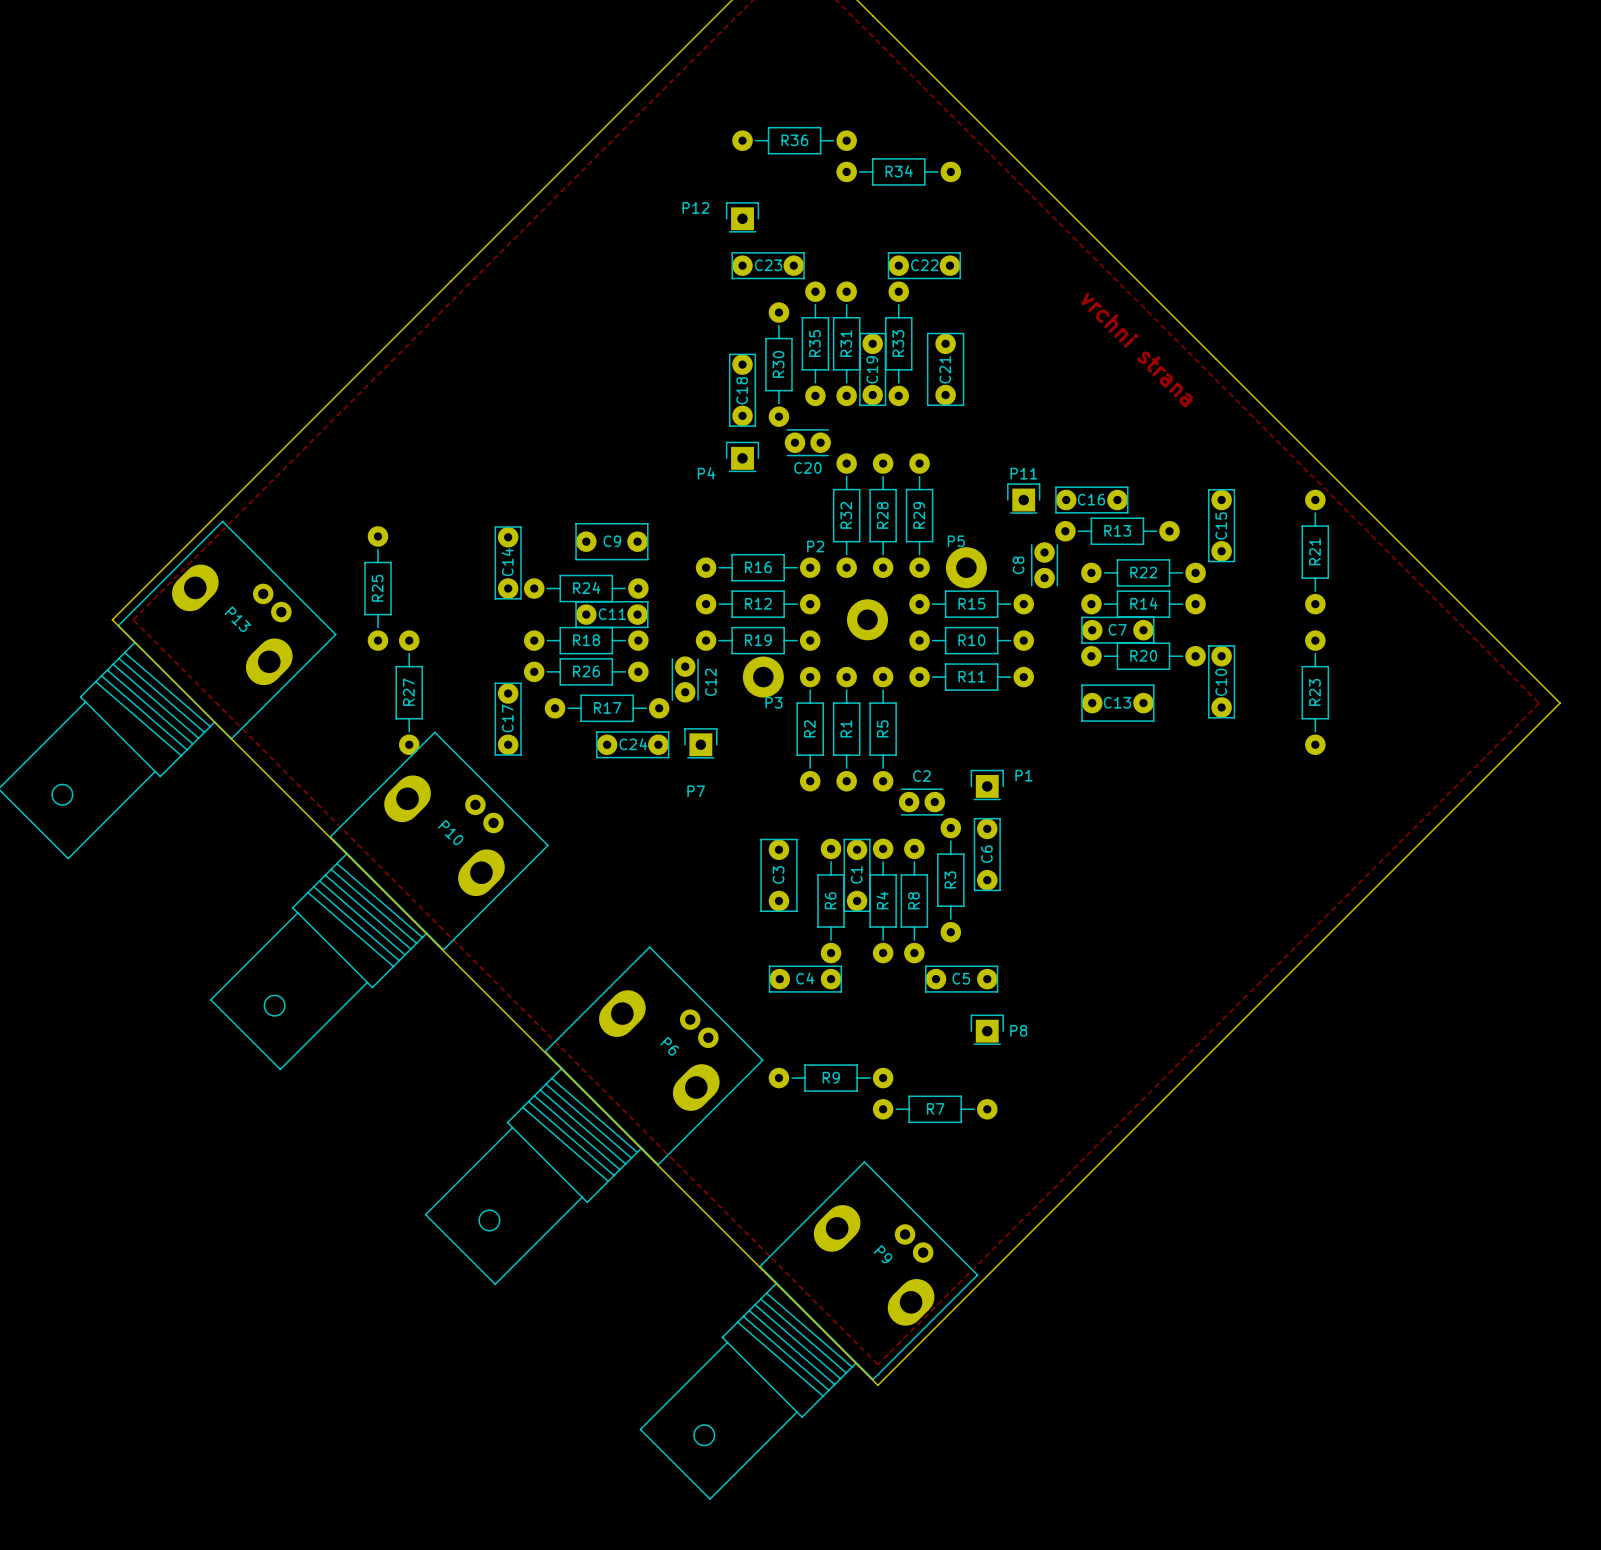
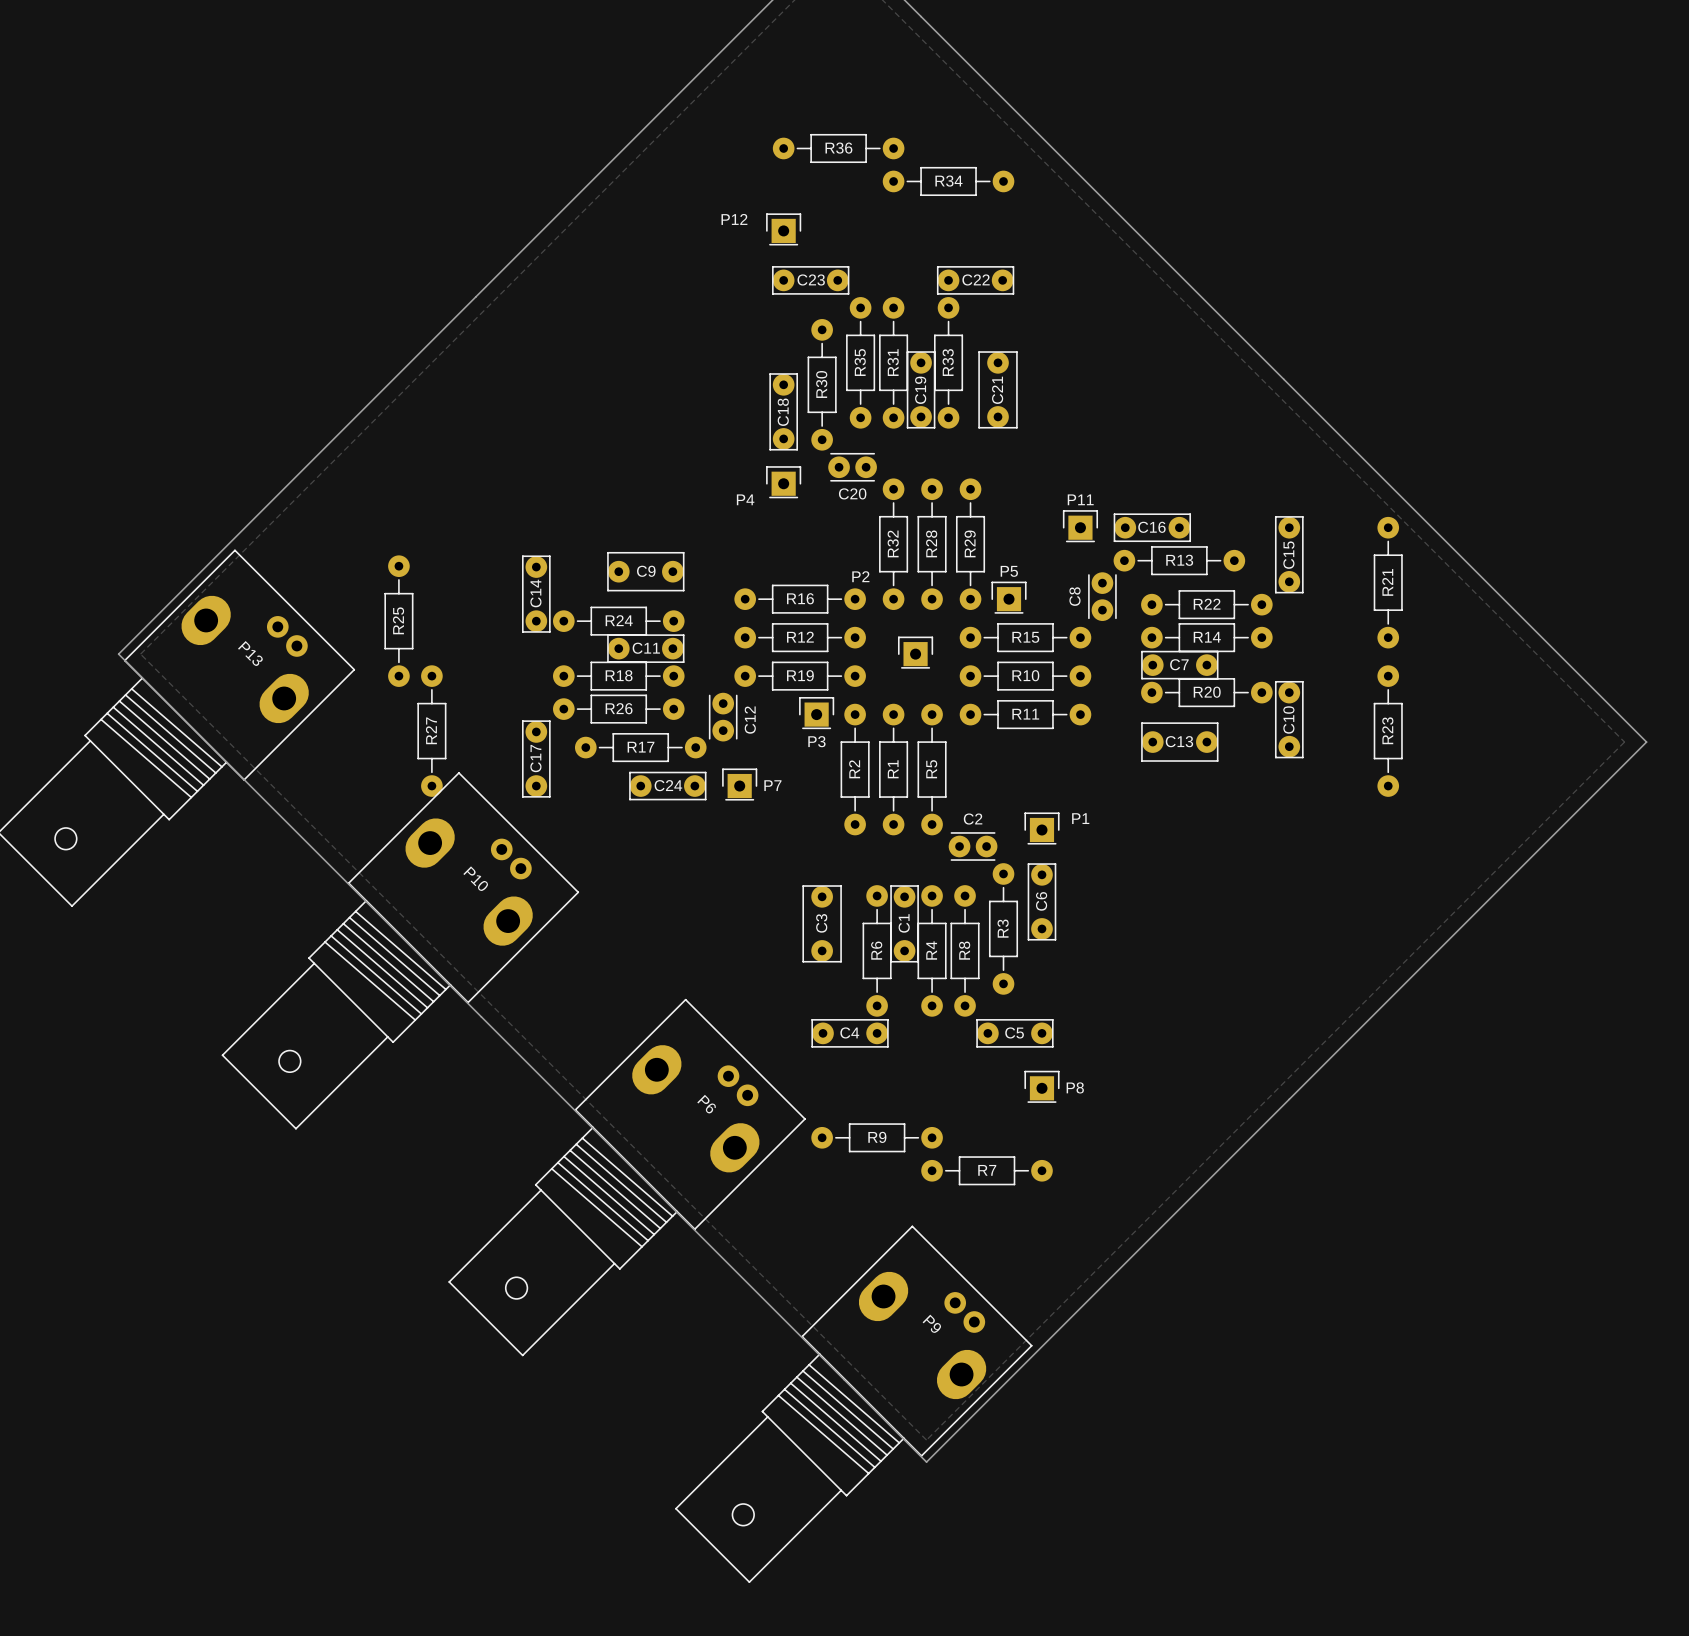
text: vrchni strana (1137, 349) -> none
P5 footprint: [945, 547, 987, 589] -> [991, 581, 1027, 614]
P2 footprint: [846, 599, 888, 641] -> [897, 636, 934, 669]
P3 footprint: [742, 656, 784, 698] -> [799, 697, 835, 730]
P7 name position: P7 (696, 791) -> P7 (772, 785)

